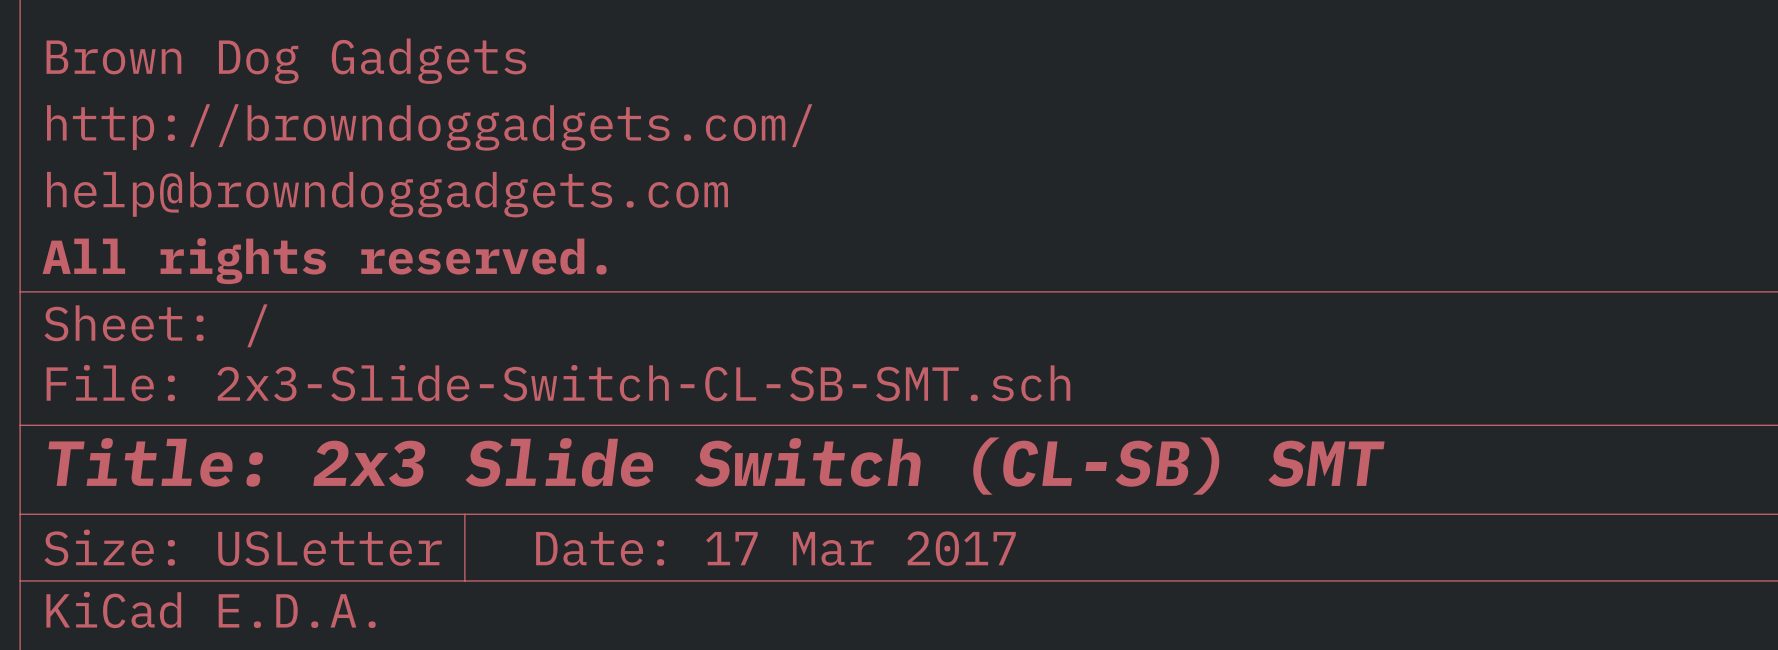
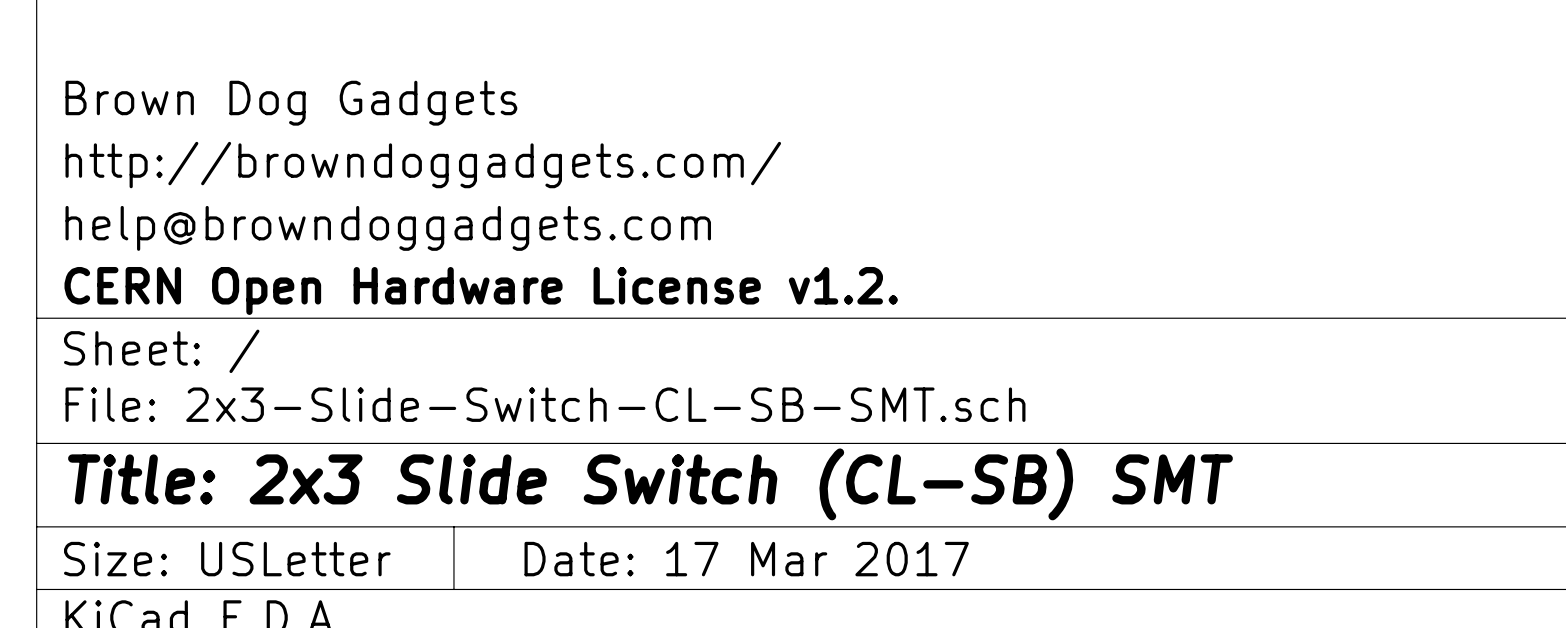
title block: All rights reserved. (324, 261) -> CERN Open Hardware License v1.2. (481, 290)

